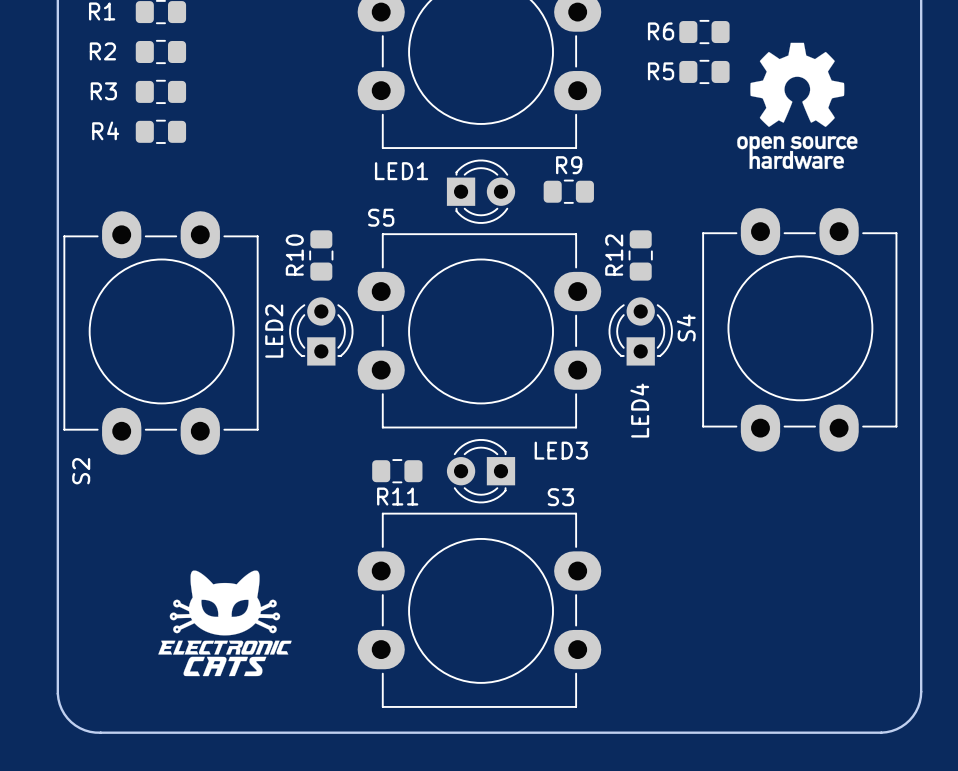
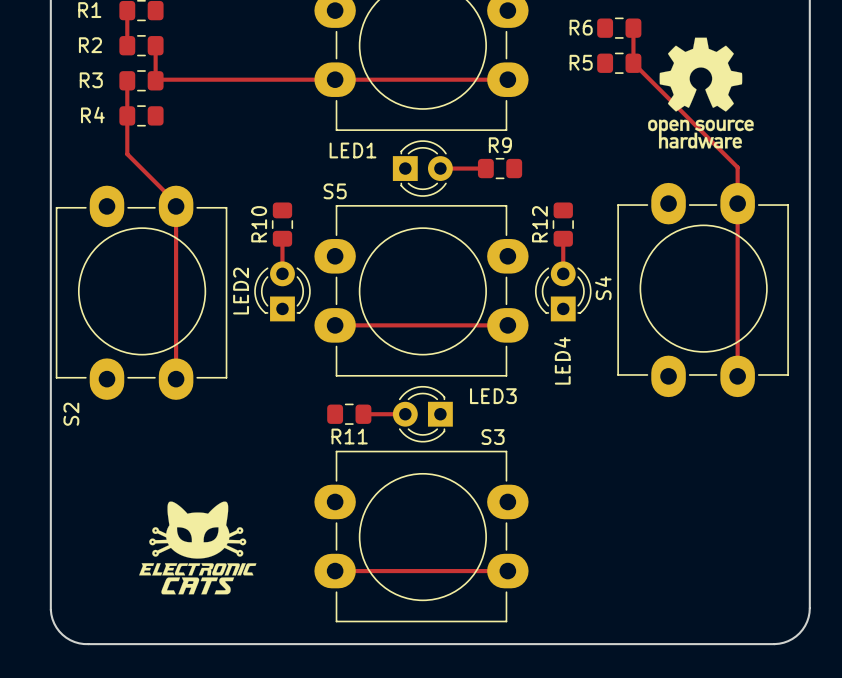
track: none -> (127, 10) (127, 45)
track: none -> (633, 28) (633, 63) (737, 167) (737, 376)
track: none -> (155, 45) (155, 80) (507, 79)
track: none -> (127, 80) (127, 154) (176, 202) (176, 379)
track: none -> (440, 168) (485, 168)
track: none -> (282, 238) (282, 273)
track: none -> (563, 238) (563, 273)
track: none -> (335, 325) (507, 325)
track: none -> (363, 414) (405, 414)
track: none -> (335, 571) (507, 571)

